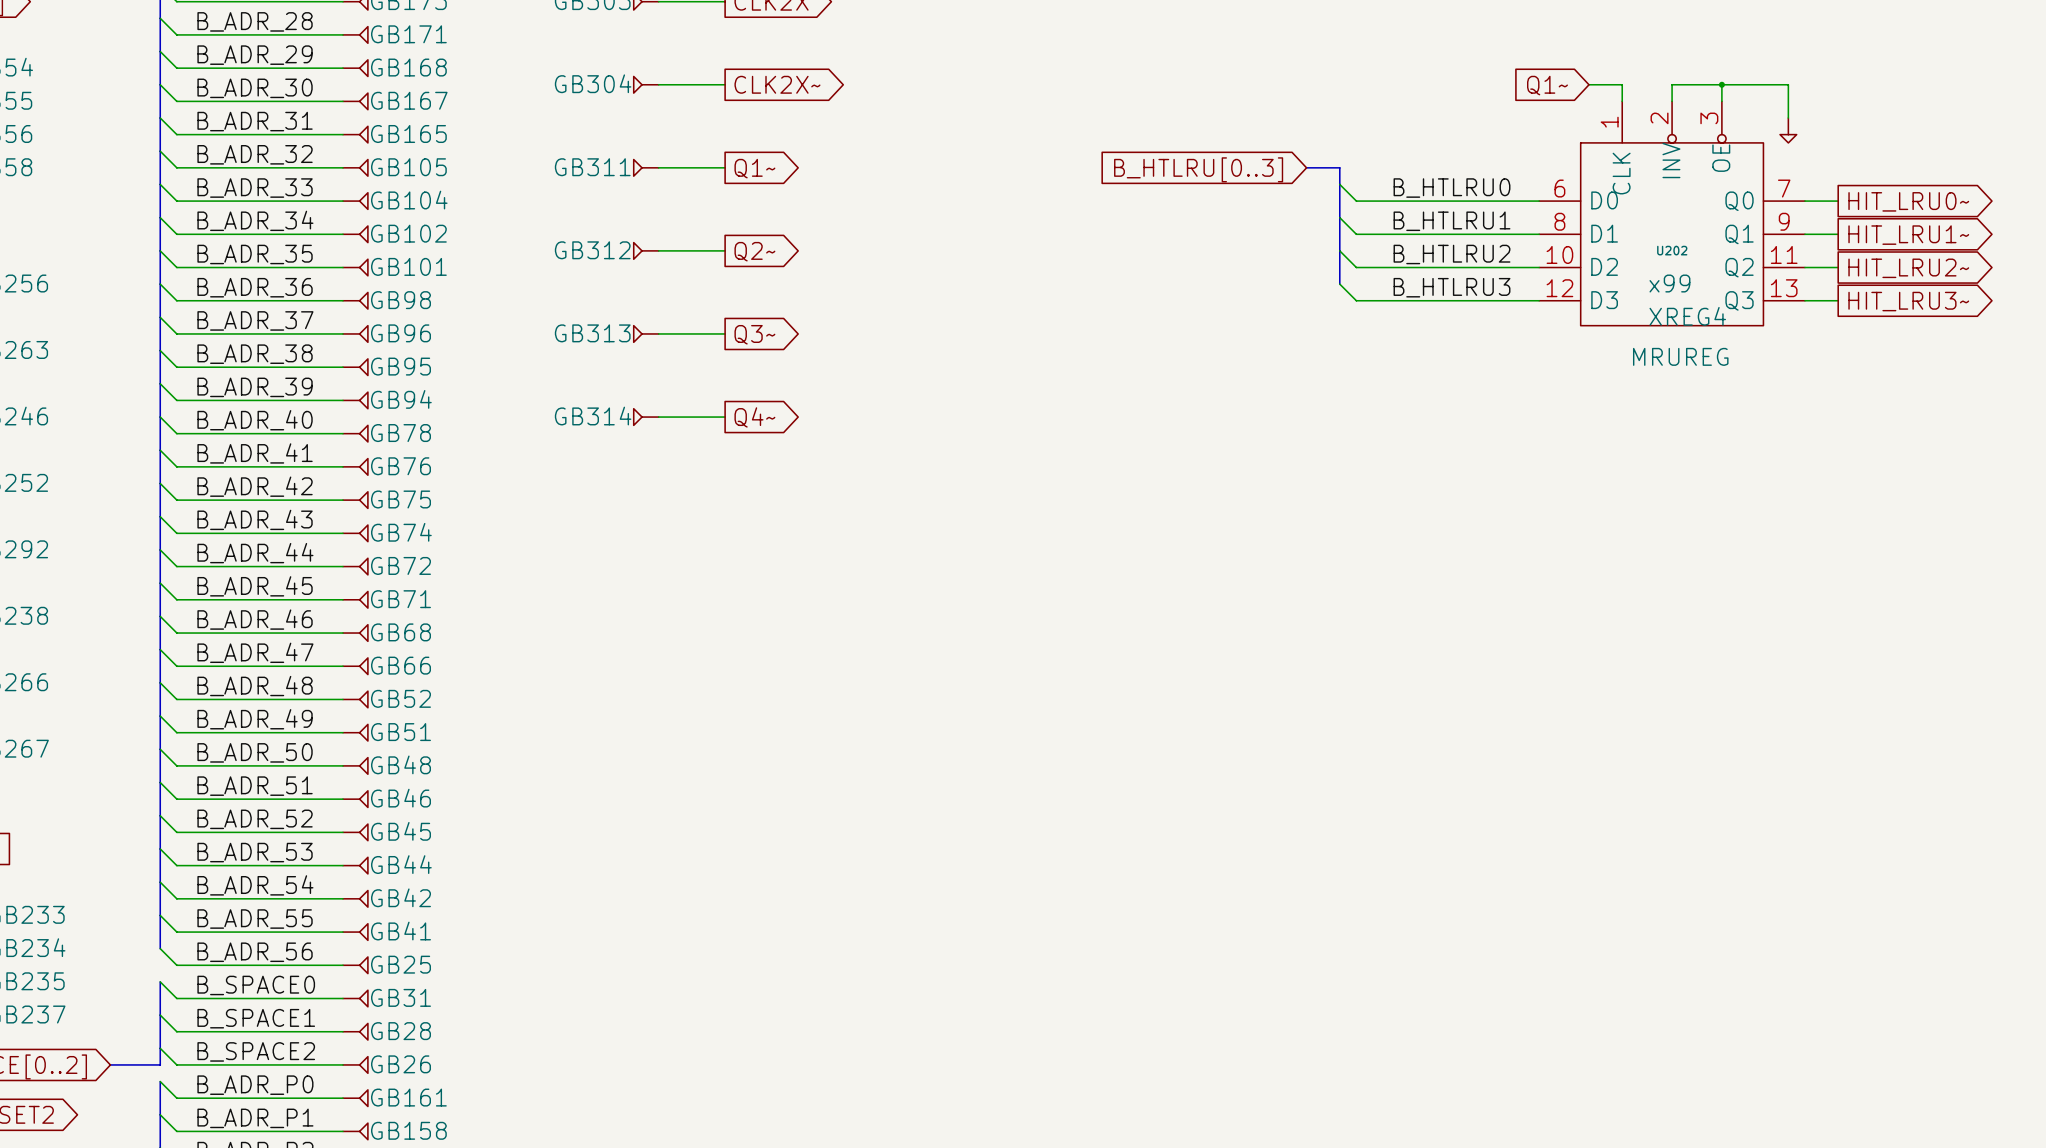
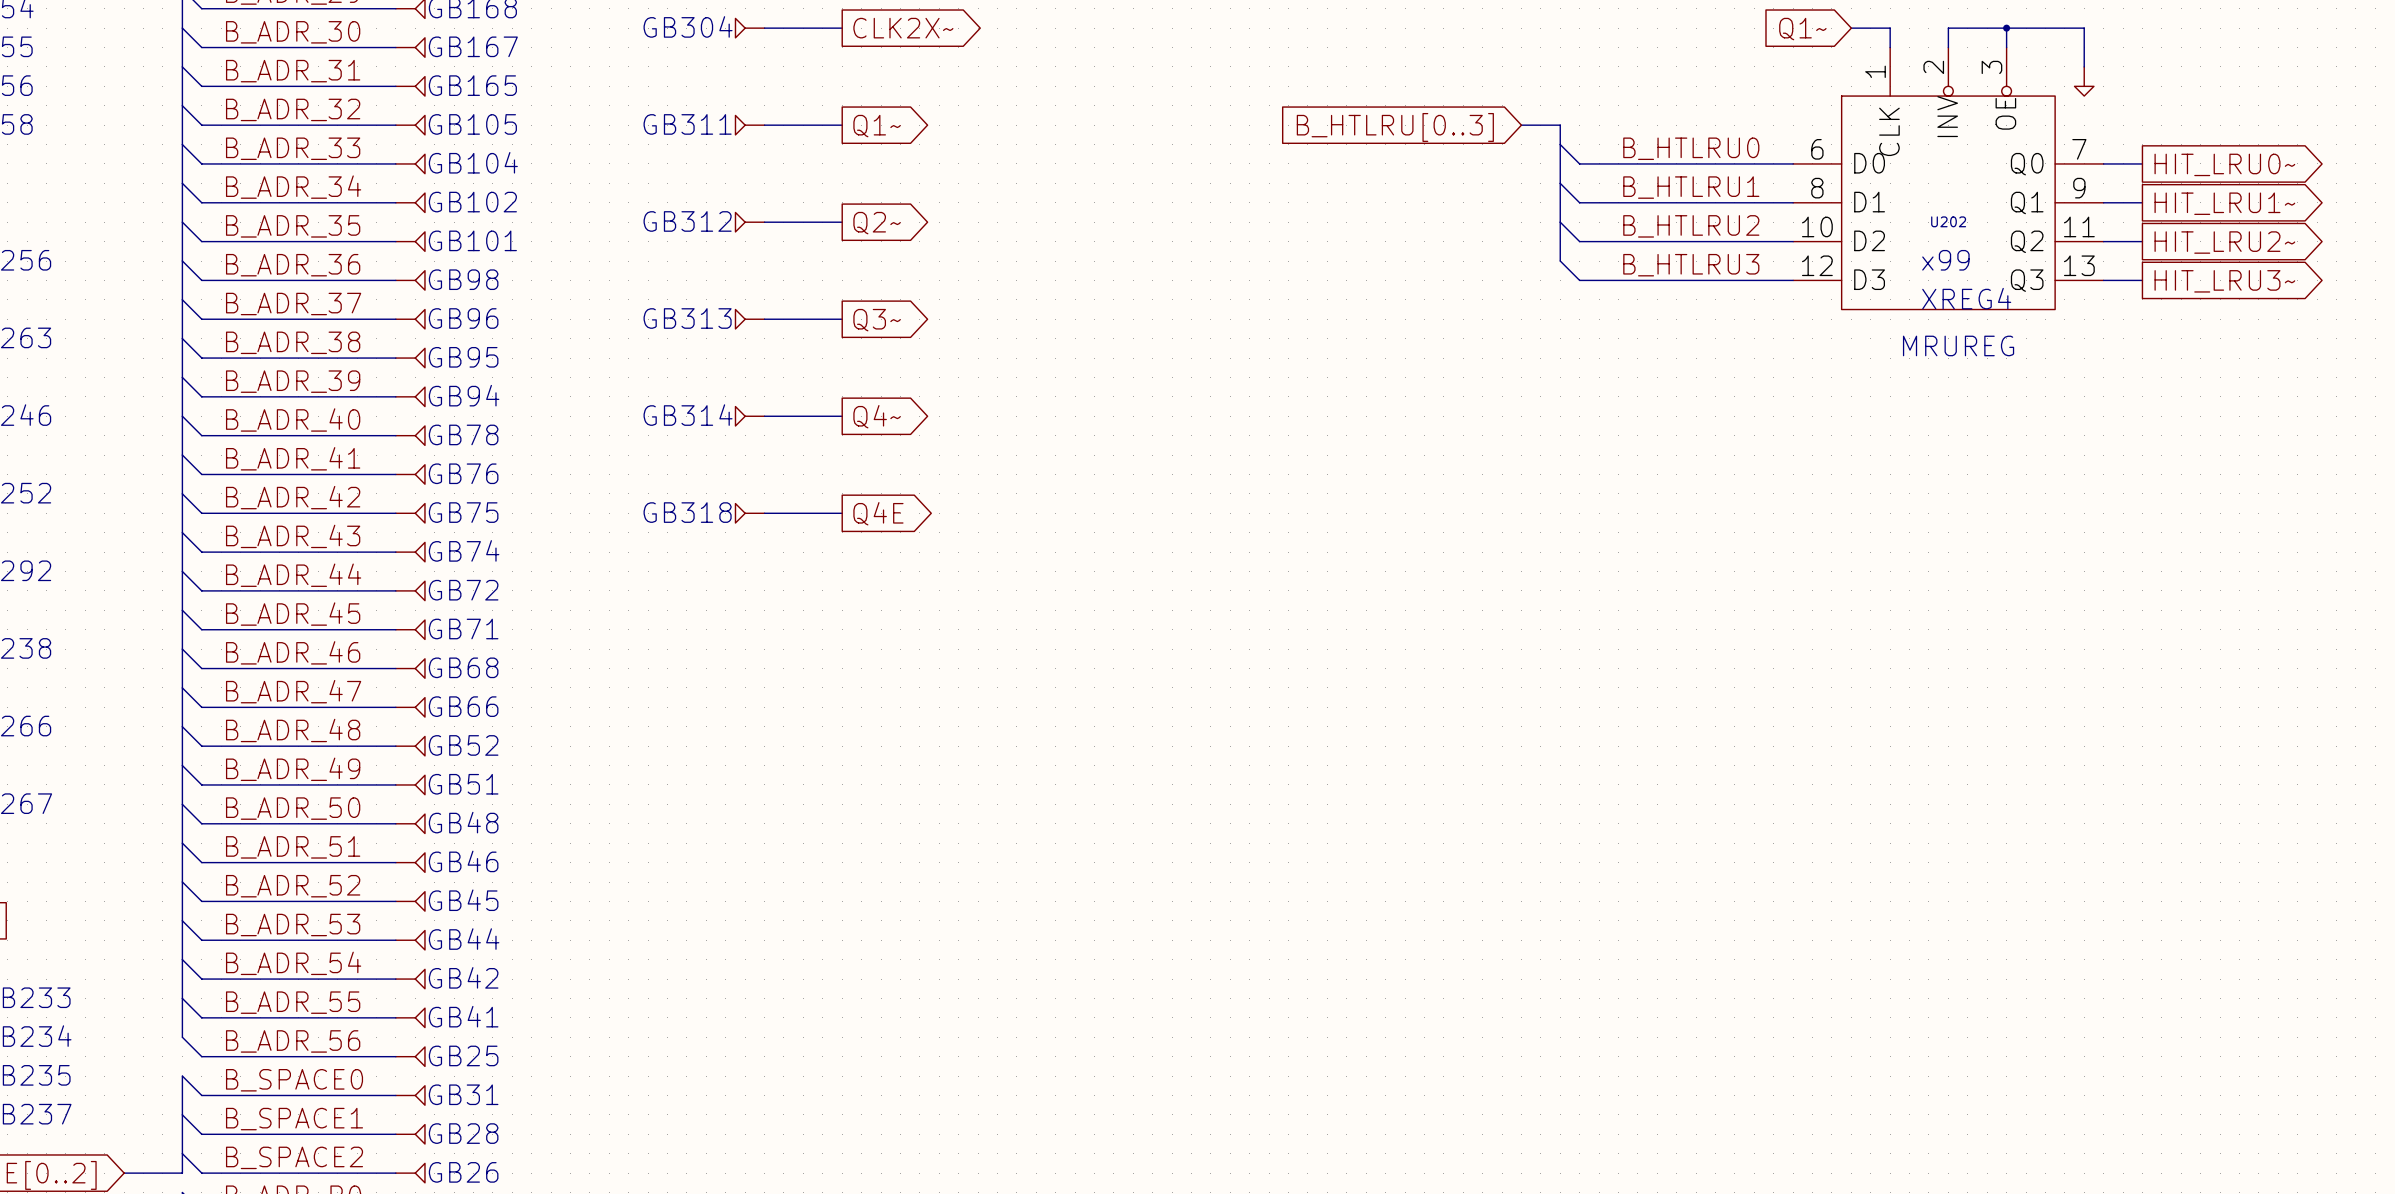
GB318: none -> (749, 513)
wire: none -> (764, 513) (842, 513)
global label: none -> Q4E (878, 513)

